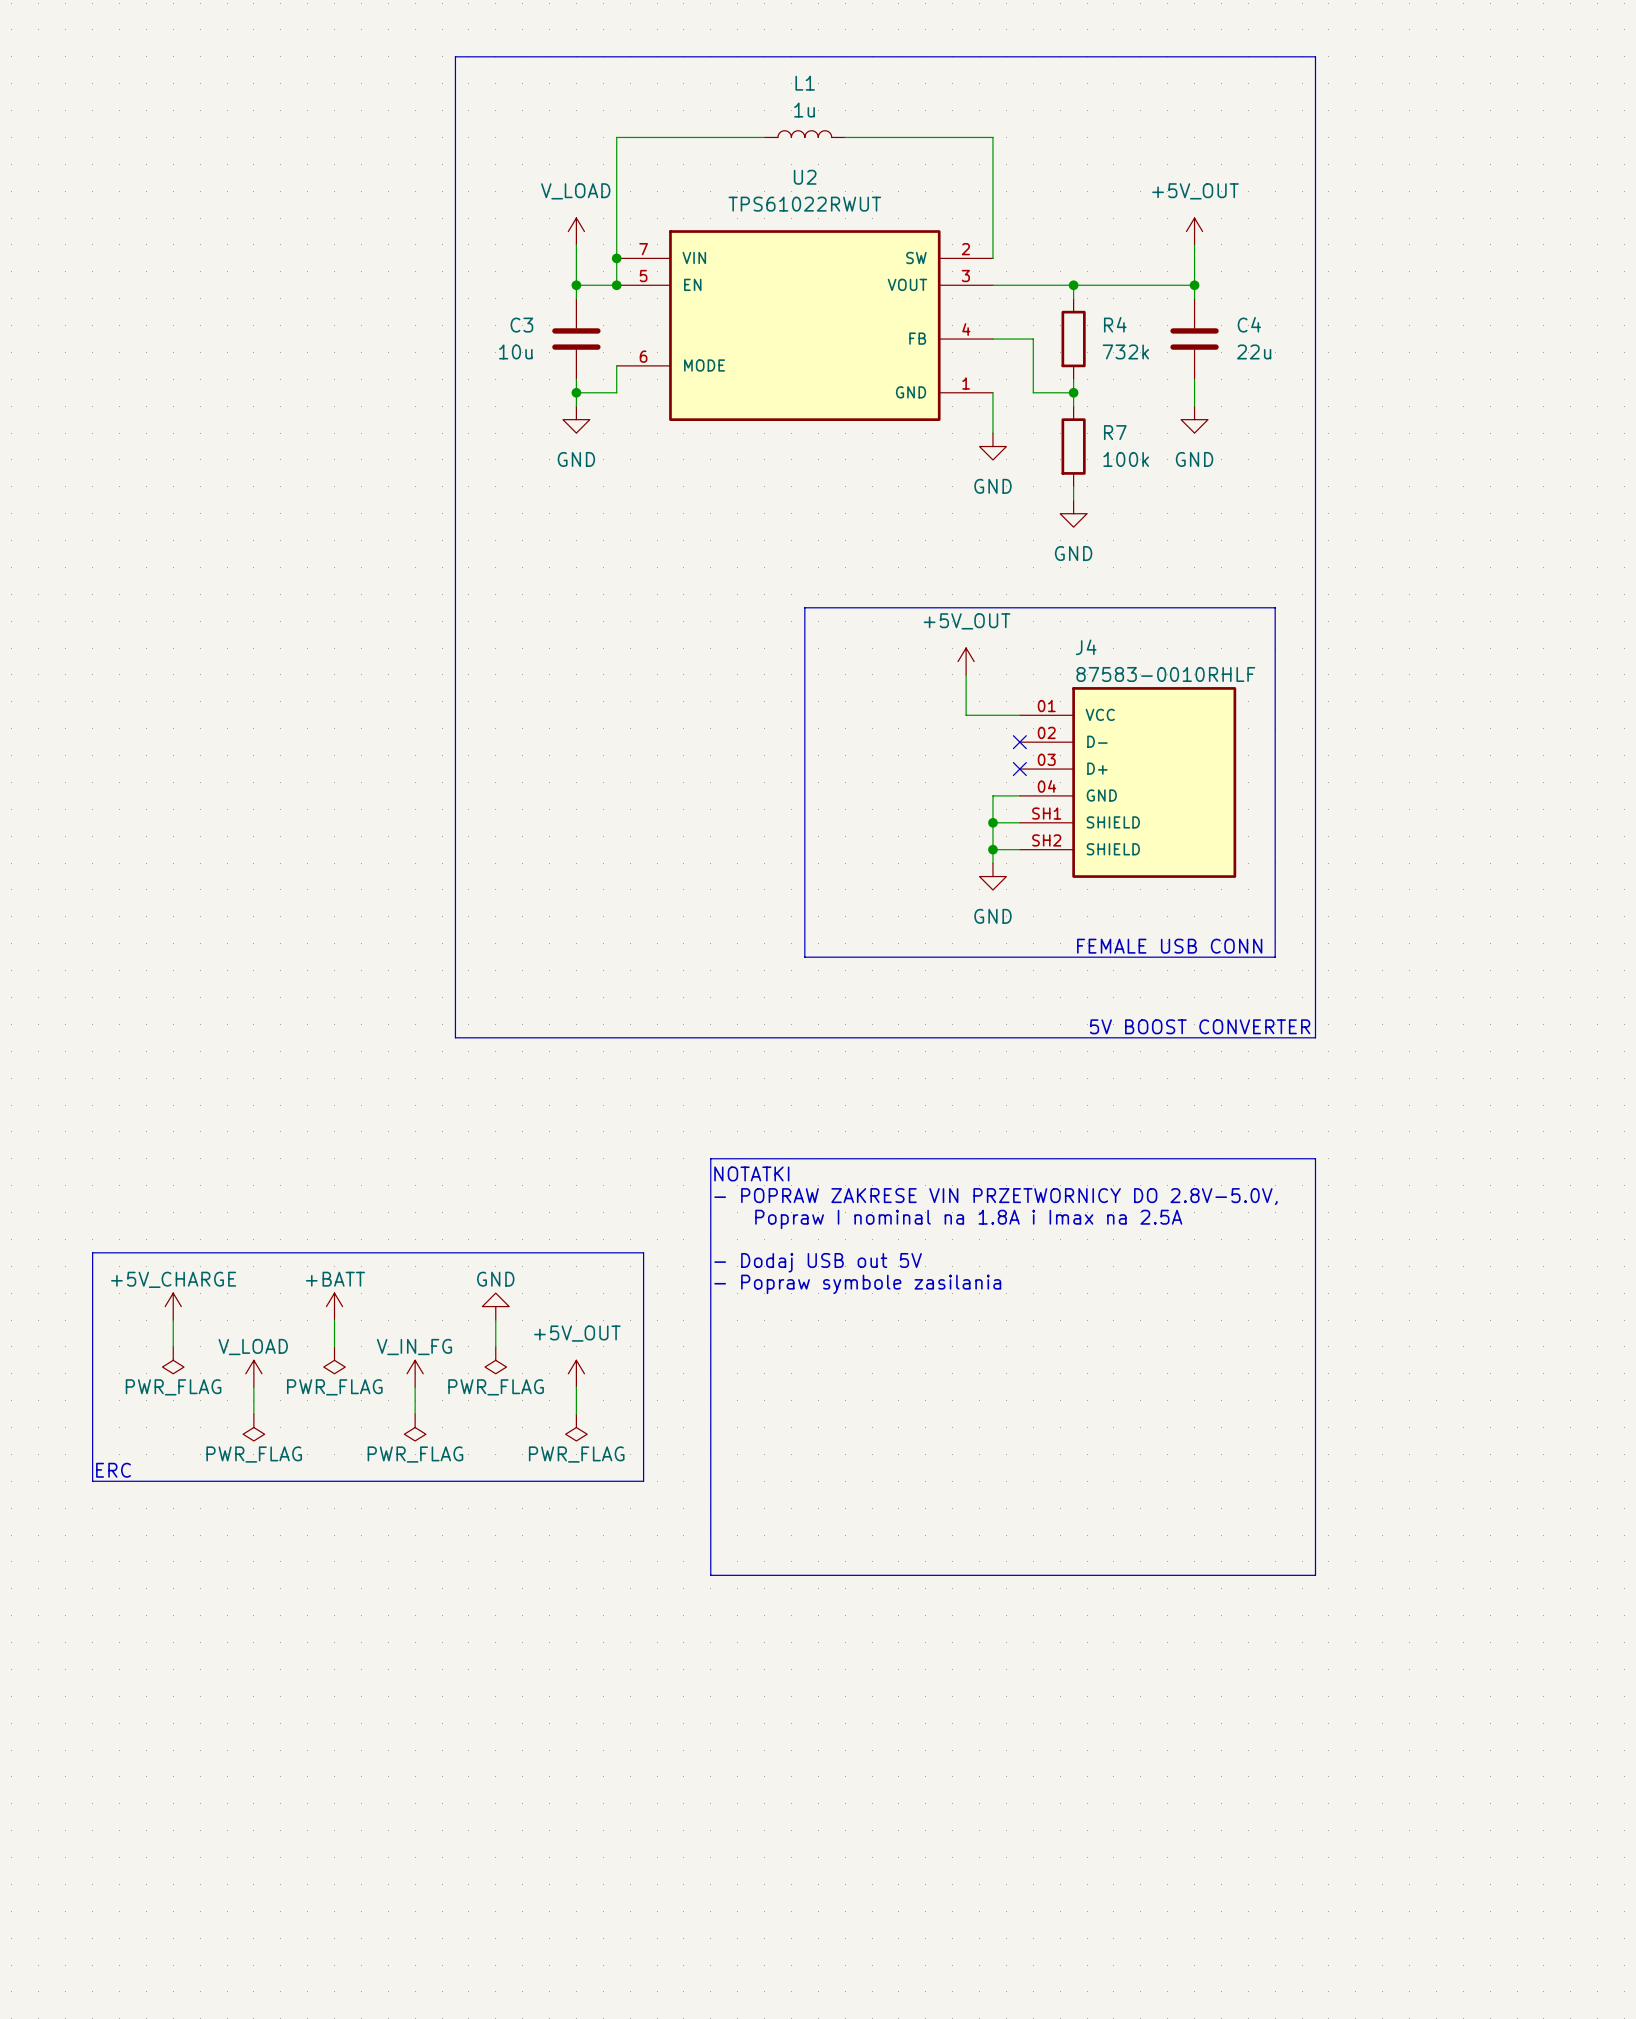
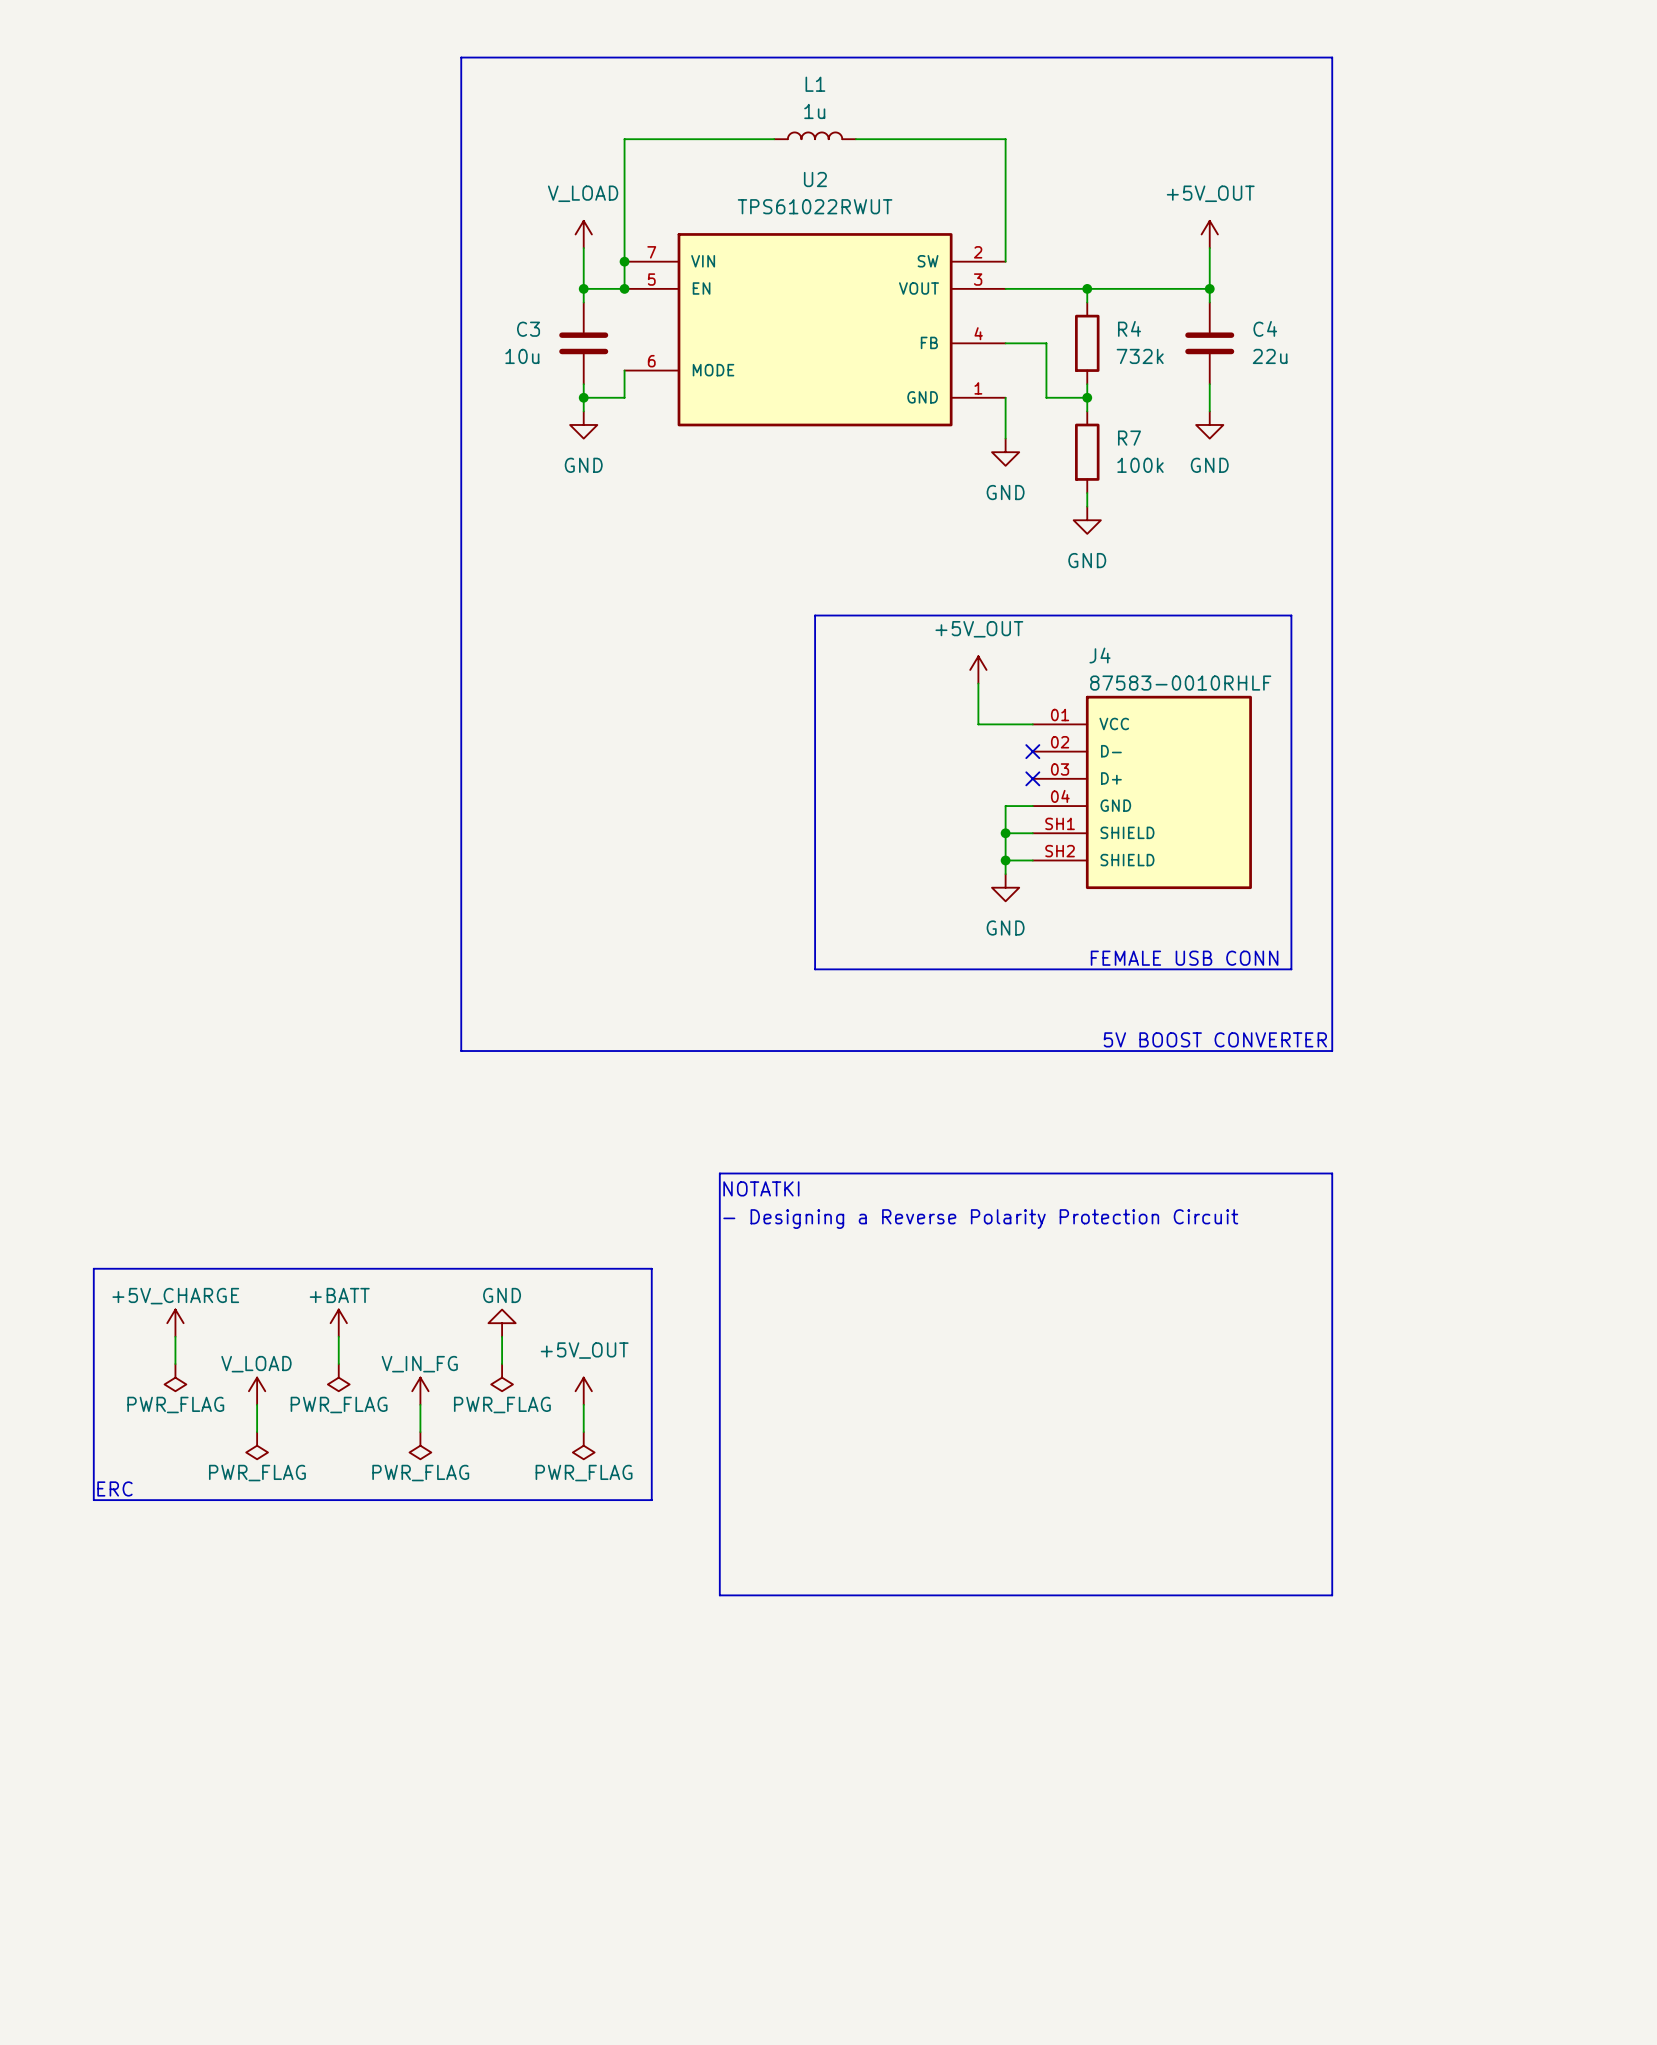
text: - POPRAW ZAKRESE VIN PRZETWORNICY DO 2.8V-5.0V, (995, 1196) -> - Designing a Reverse Polarity Protection Circuit (980, 1219)
text: Popraw I nominal na 1.8A i Imax na 2.5A (968, 1219) -> none
text: - Dodaj USB out 5V (818, 1262) -> none
text: - Popraw symbole zasilania (857, 1284) -> none

